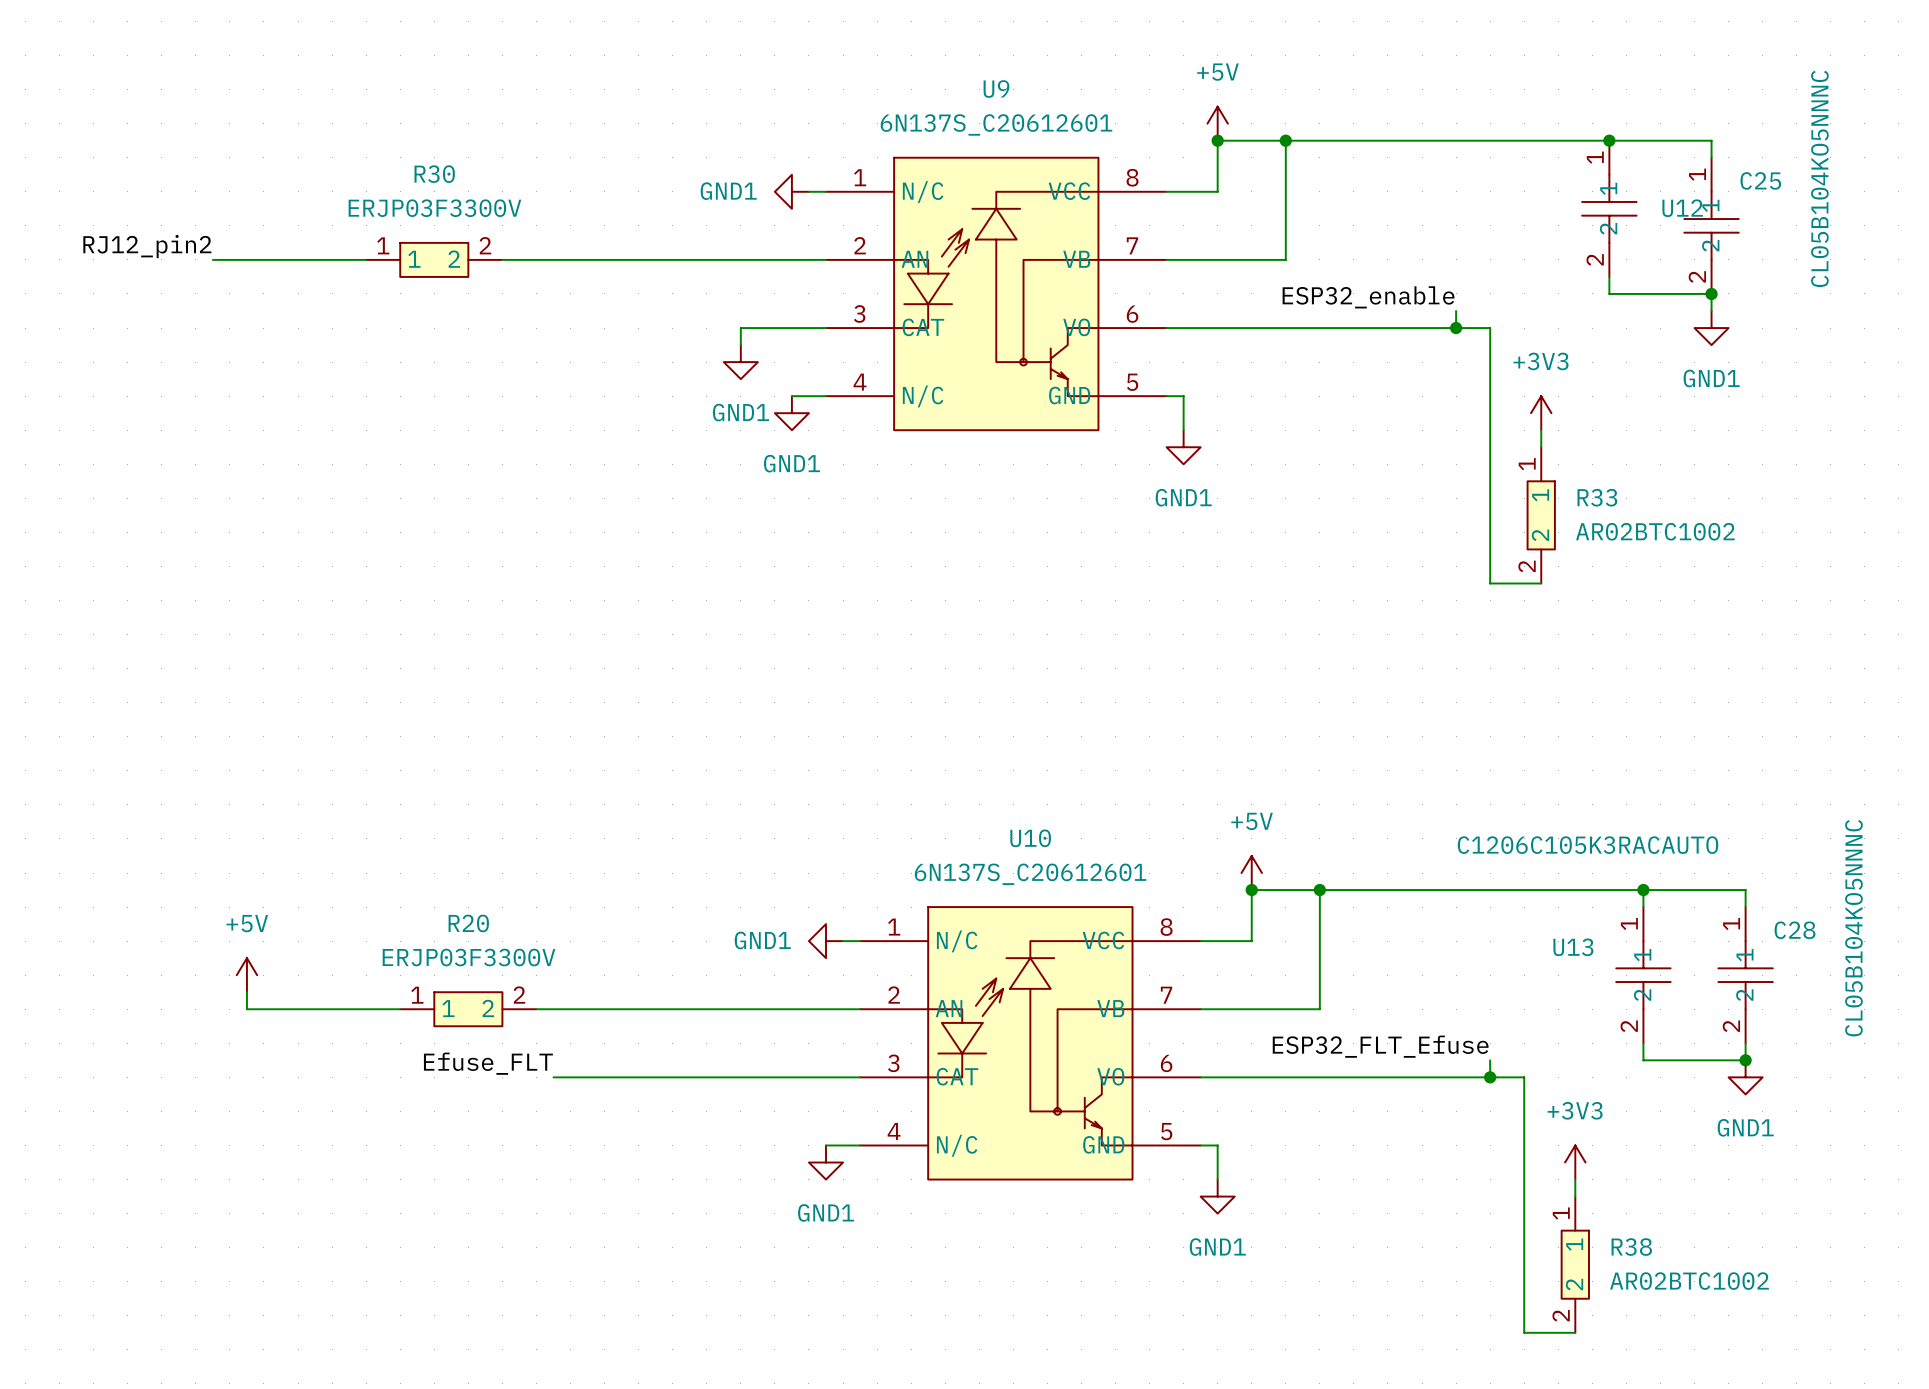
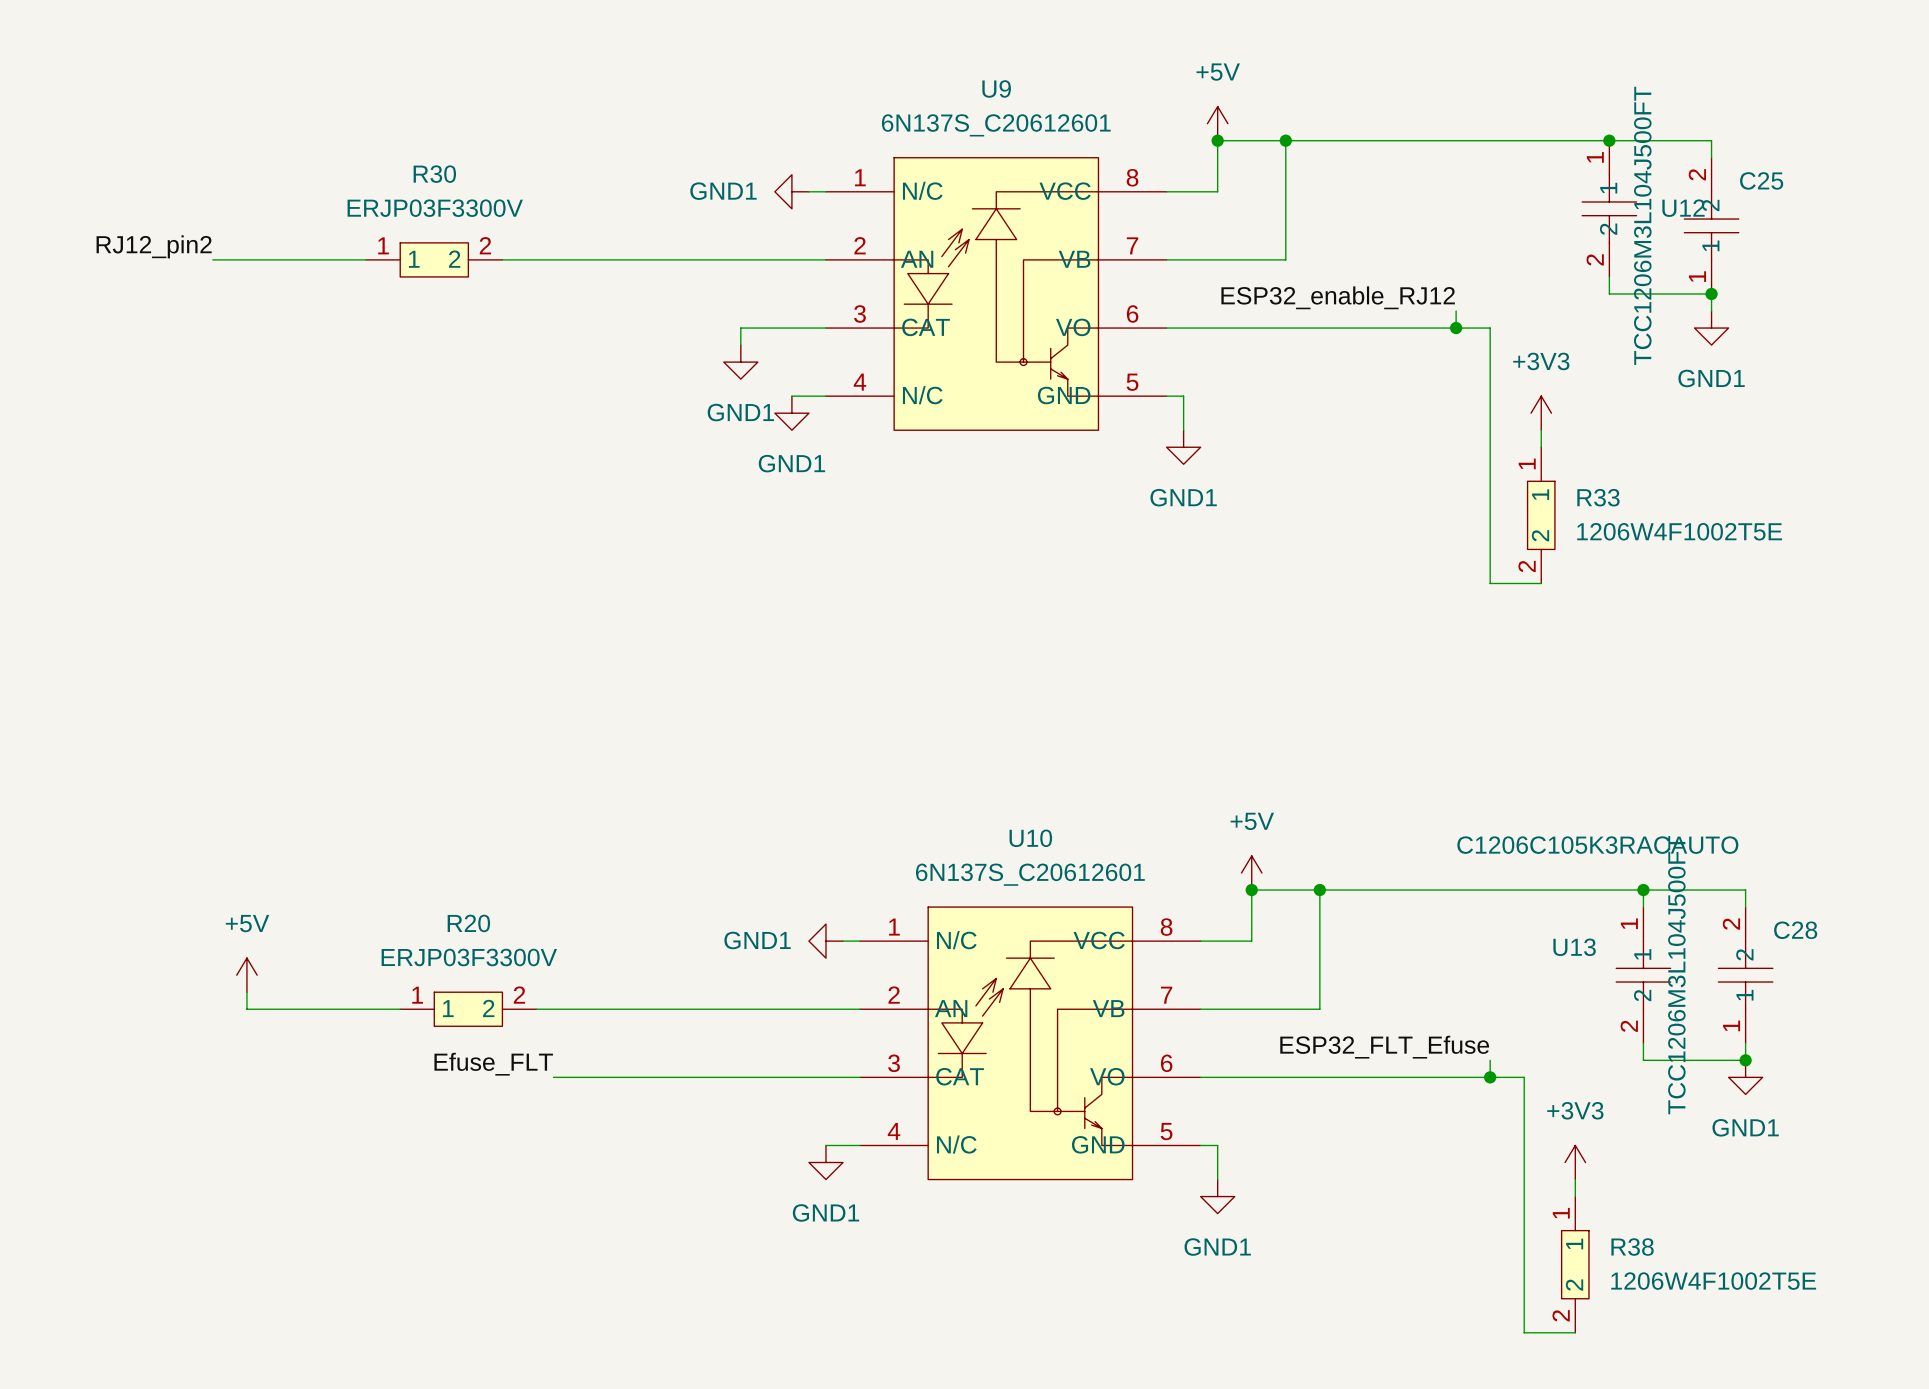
C25 value: CL05B104KO5NNNC (1819, 178) -> TCC1206M3L104J500FT (1642, 225)
C25 rotation: 0° (1711, 225) -> 180° (1711, 225)
label: ESP32_enable (1368, 297) -> ESP32_enable_RJ12 (1338, 297)
R33 value: AR02BTC1002 (1655, 531) -> 1206W4F1002T5E (1679, 531)
C28 value: CL05B104KO5NNNC (1853, 928) -> TCC1206M3L104J500FT (1676, 975)
C28 rotation: 0° (1745, 975) -> 180° (1745, 975)
R38 value: AR02BTC1002 (1689, 1281) -> 1206W4F1002T5E (1713, 1281)

